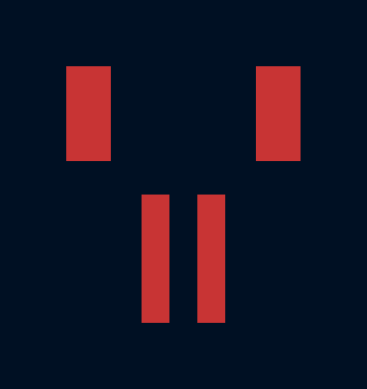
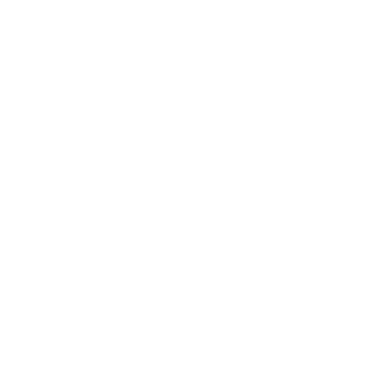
part: (183, 194) -> none

